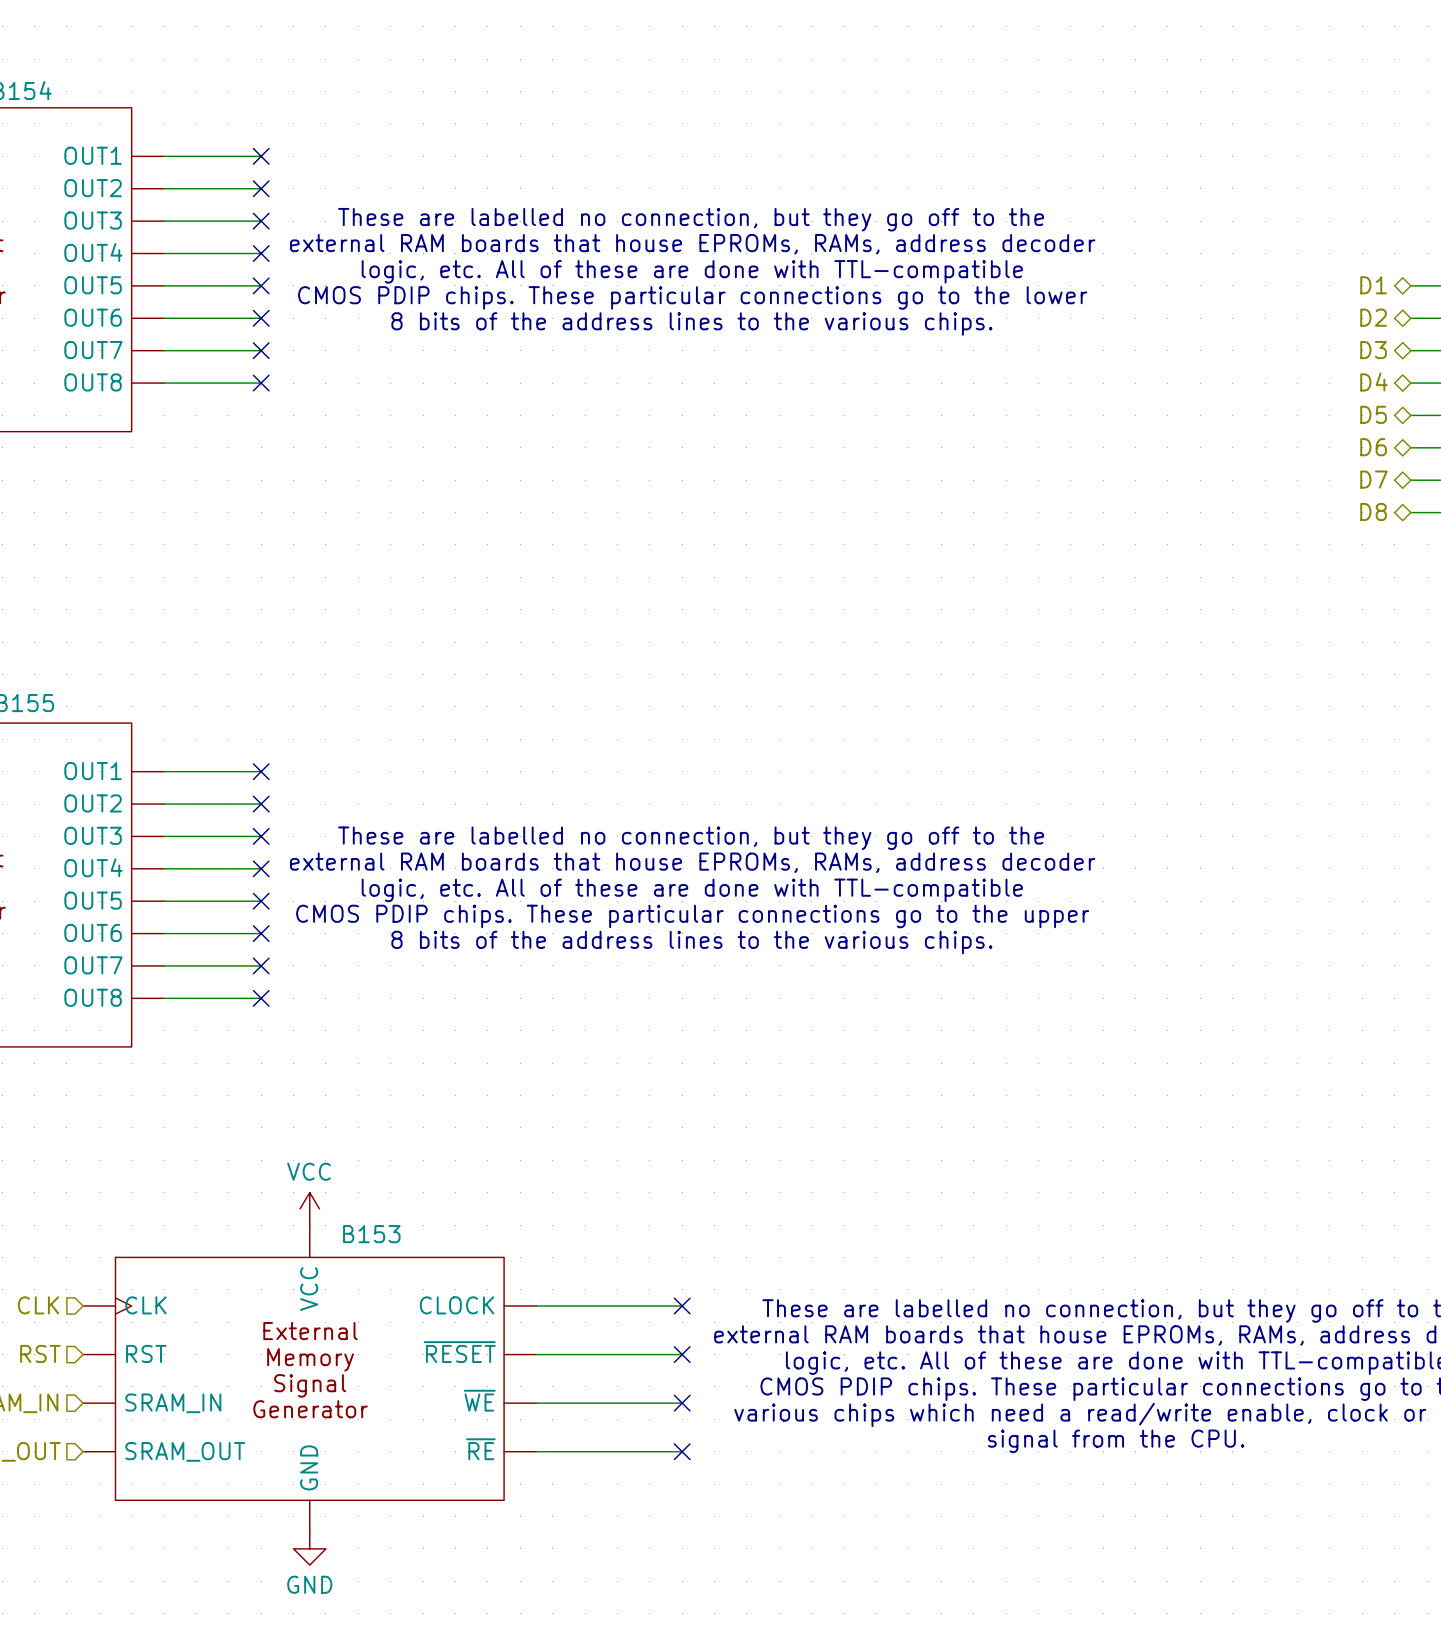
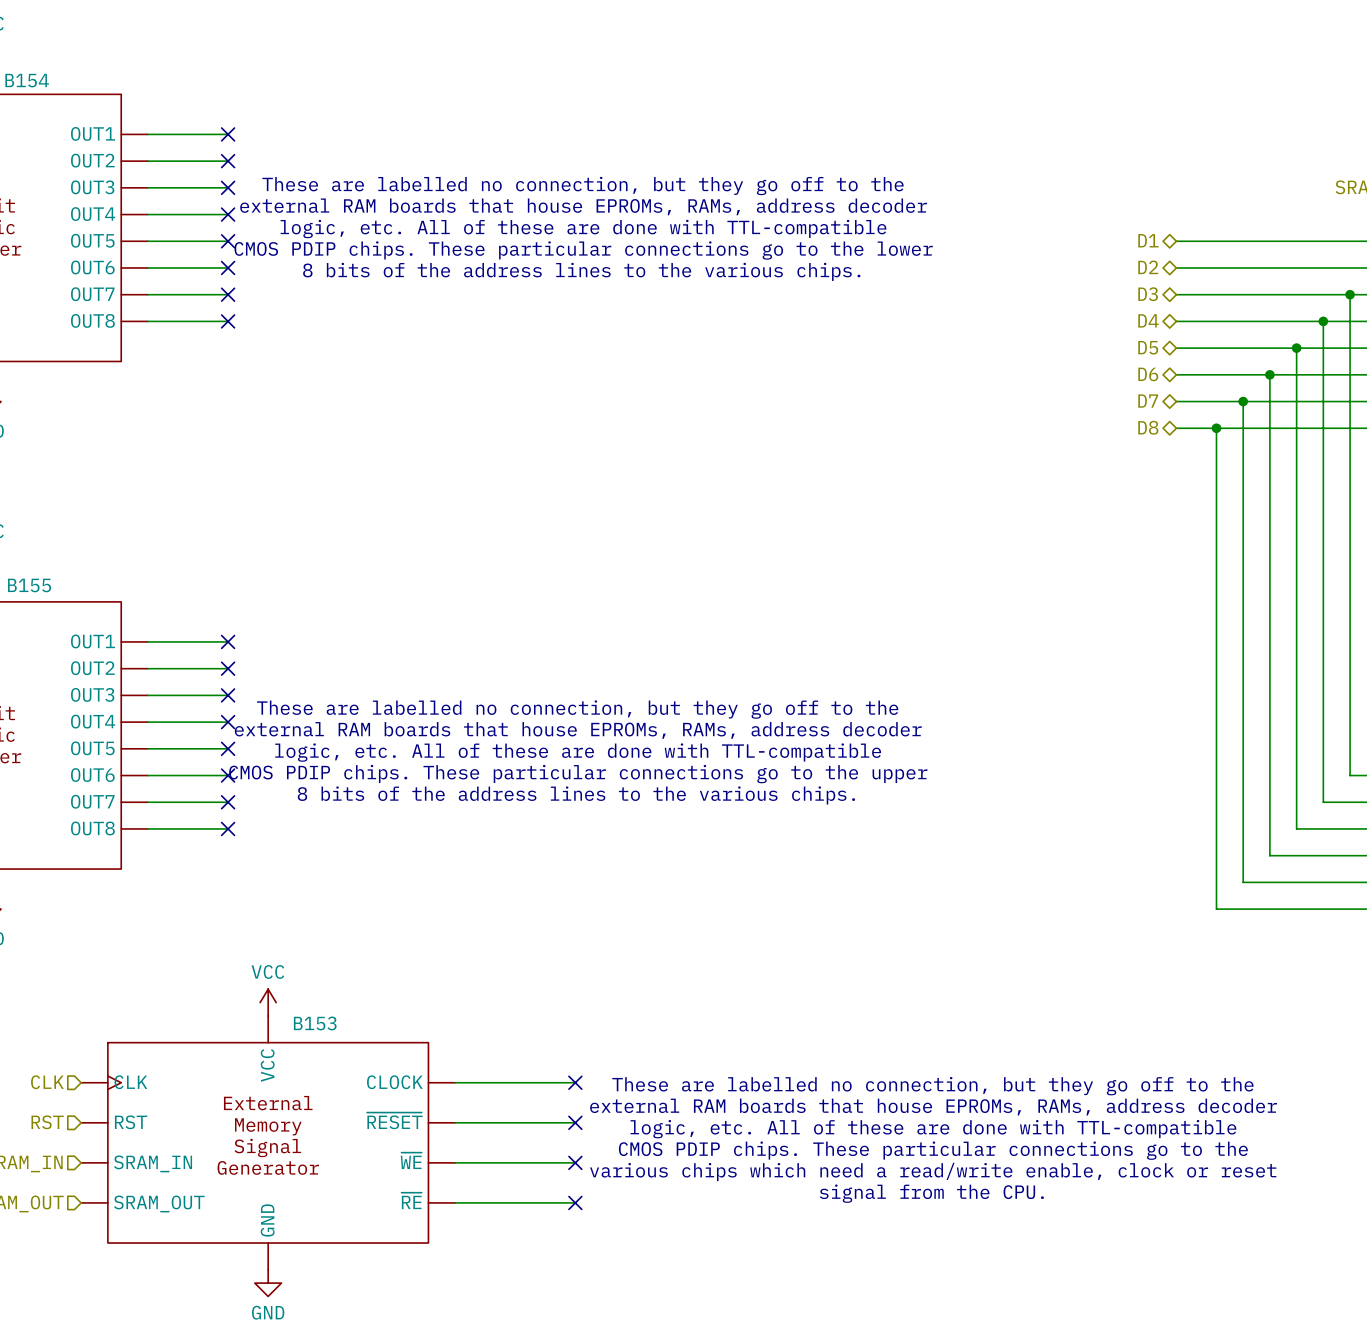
text position: These are labelled no connection, but they go off to the (691, 838) -> These are labelled no connection, but they go off to the (577, 709)
text position: external RAM boards that house EPROMs, RAMs, address decoder (692, 862) -> external RAM boards that house EPROMs, RAMs, address decoder (578, 730)
text position: logic, etc. All of these are done with TTL-compatible (692, 890) -> logic, etc. All of these are done with TTL-compatible (578, 752)
text position: CMOS PDIP chips. These particular connections go to the upper (692, 916) -> CMOS PDIP chips. These particular connections go to the upper (578, 774)
text position: 8 bits of the address lines to the various chips. (691, 942) -> 8 bits of the address lines to the various chips. (576, 795)

